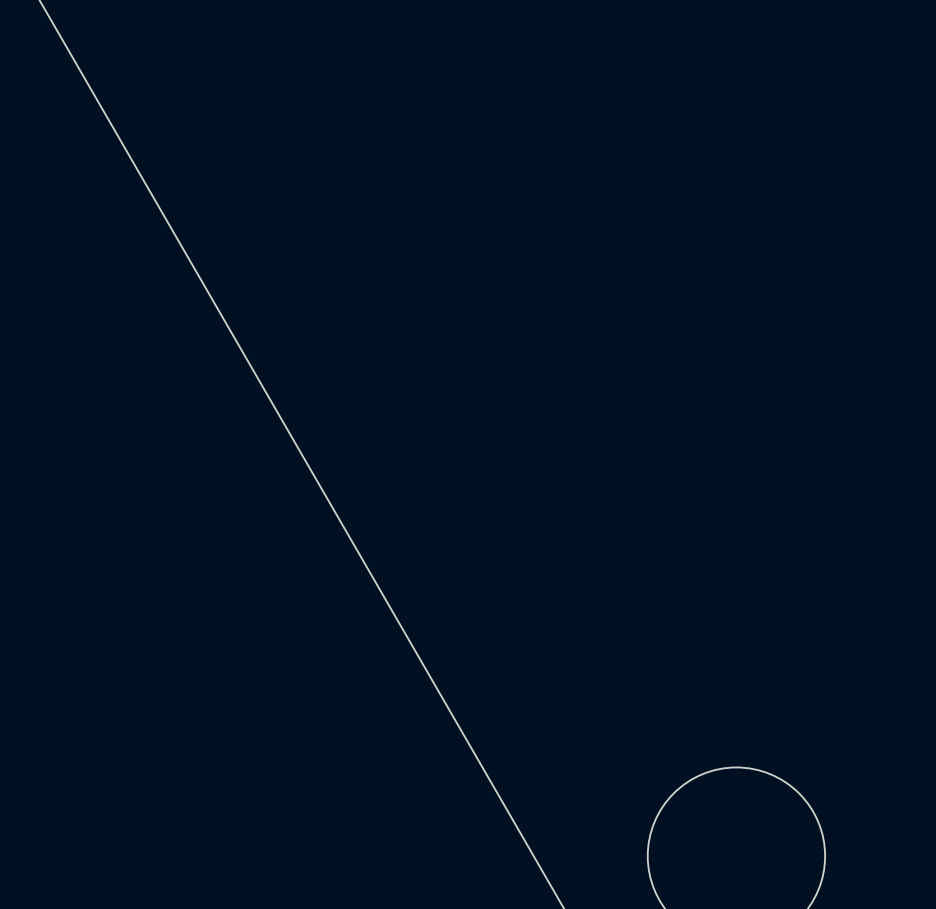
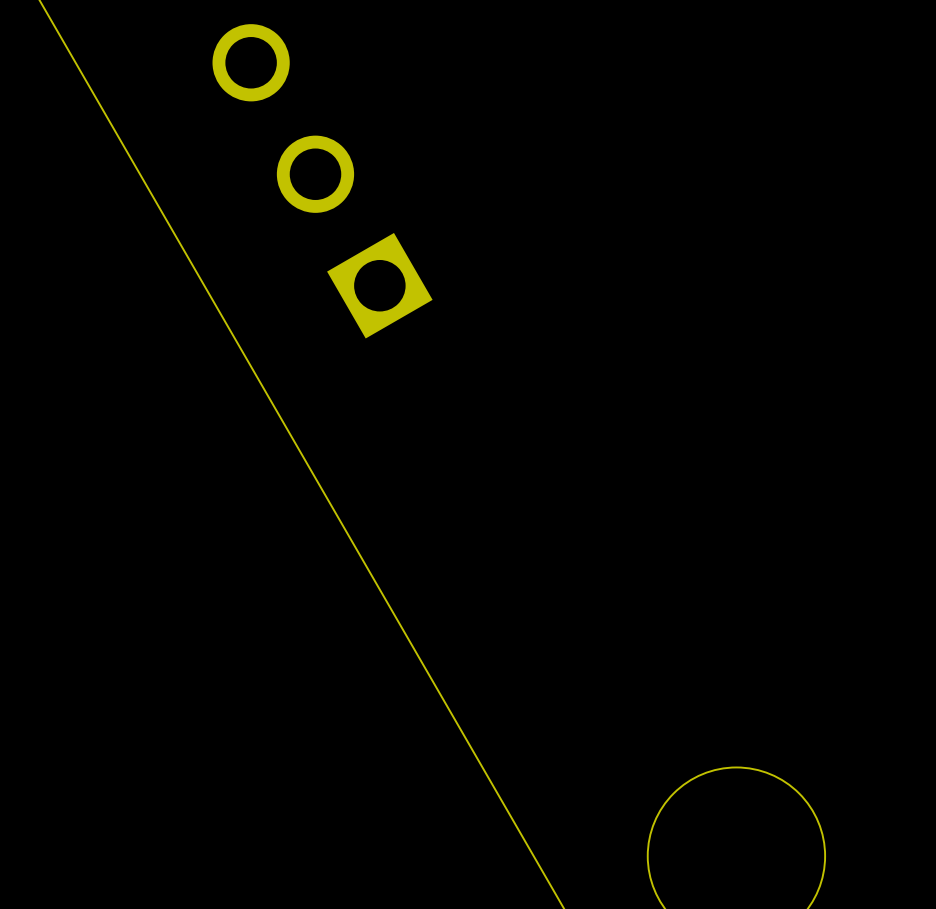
part: none -> (322, 181)

